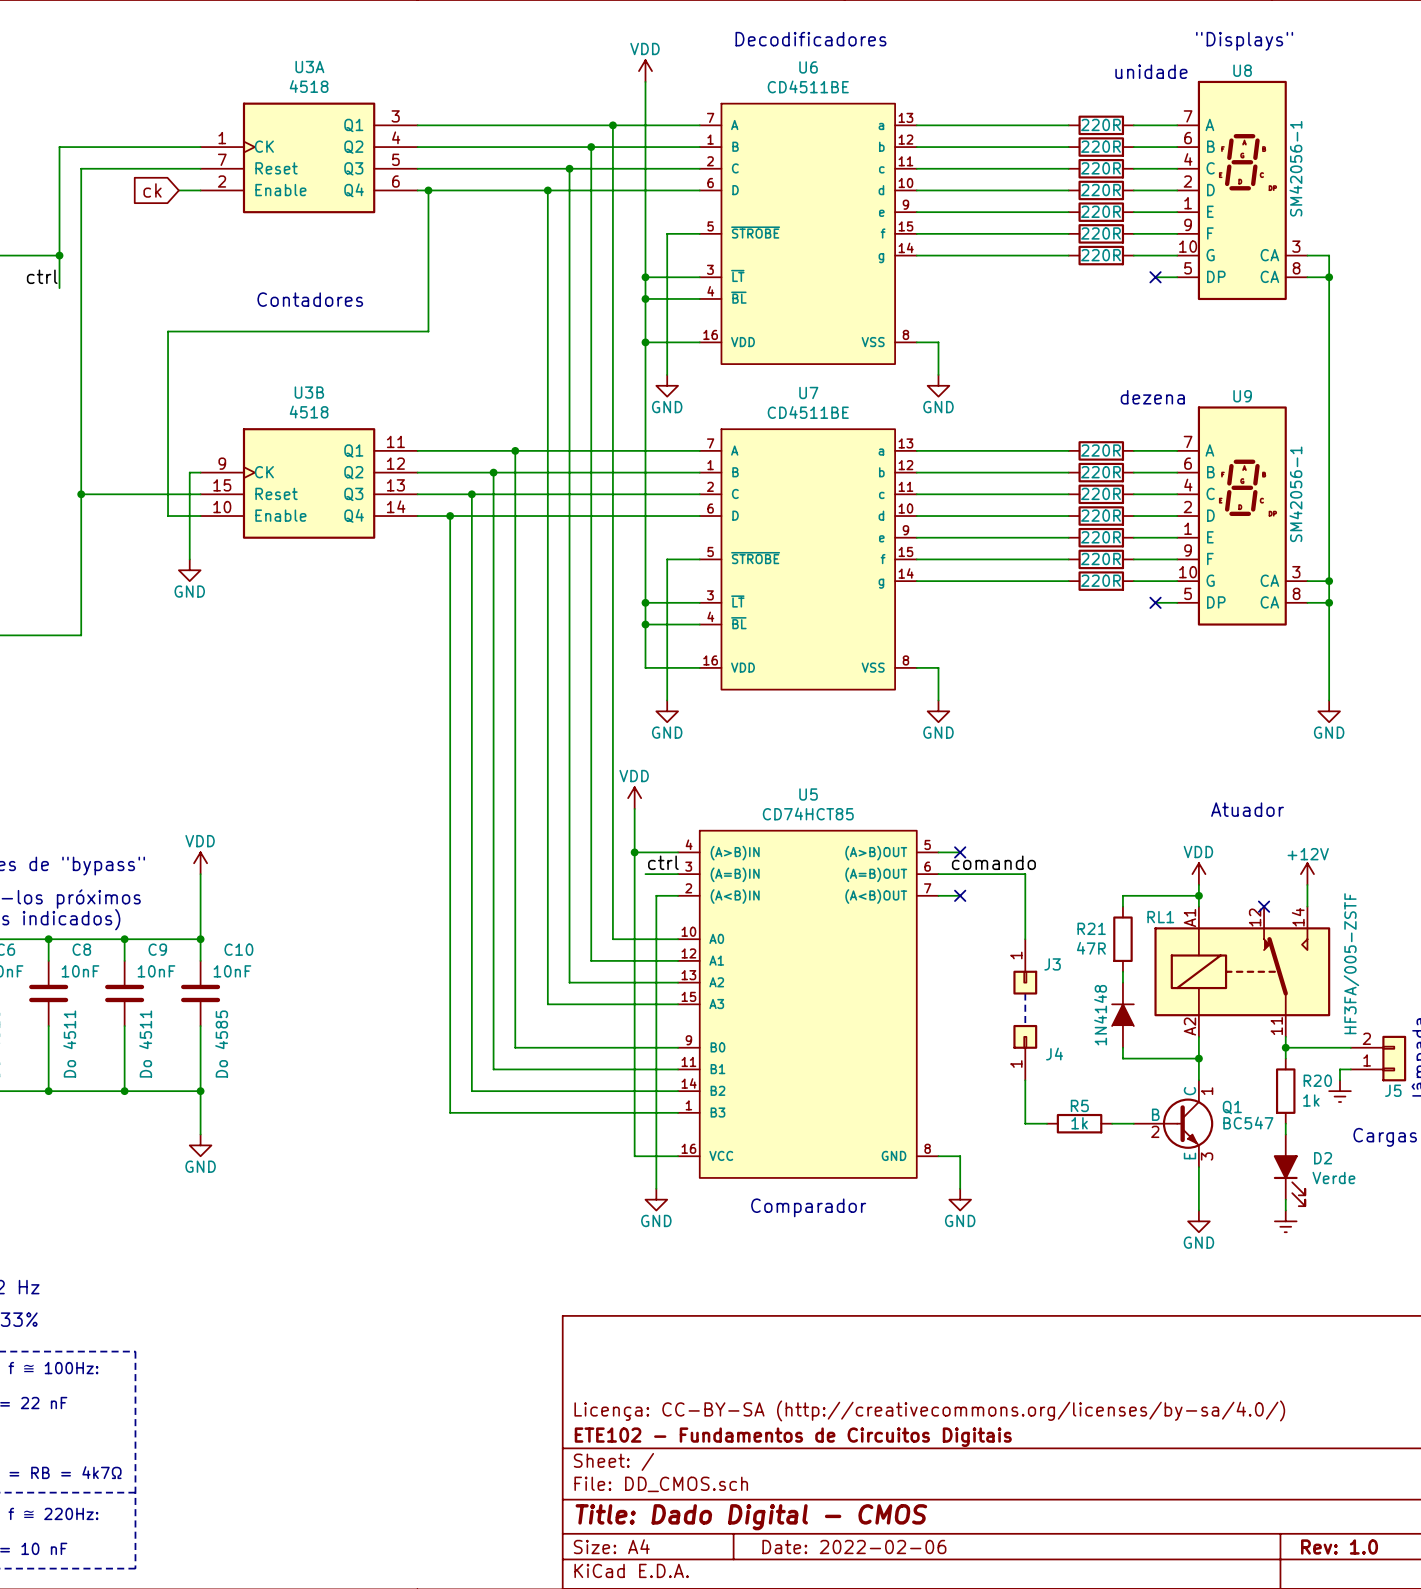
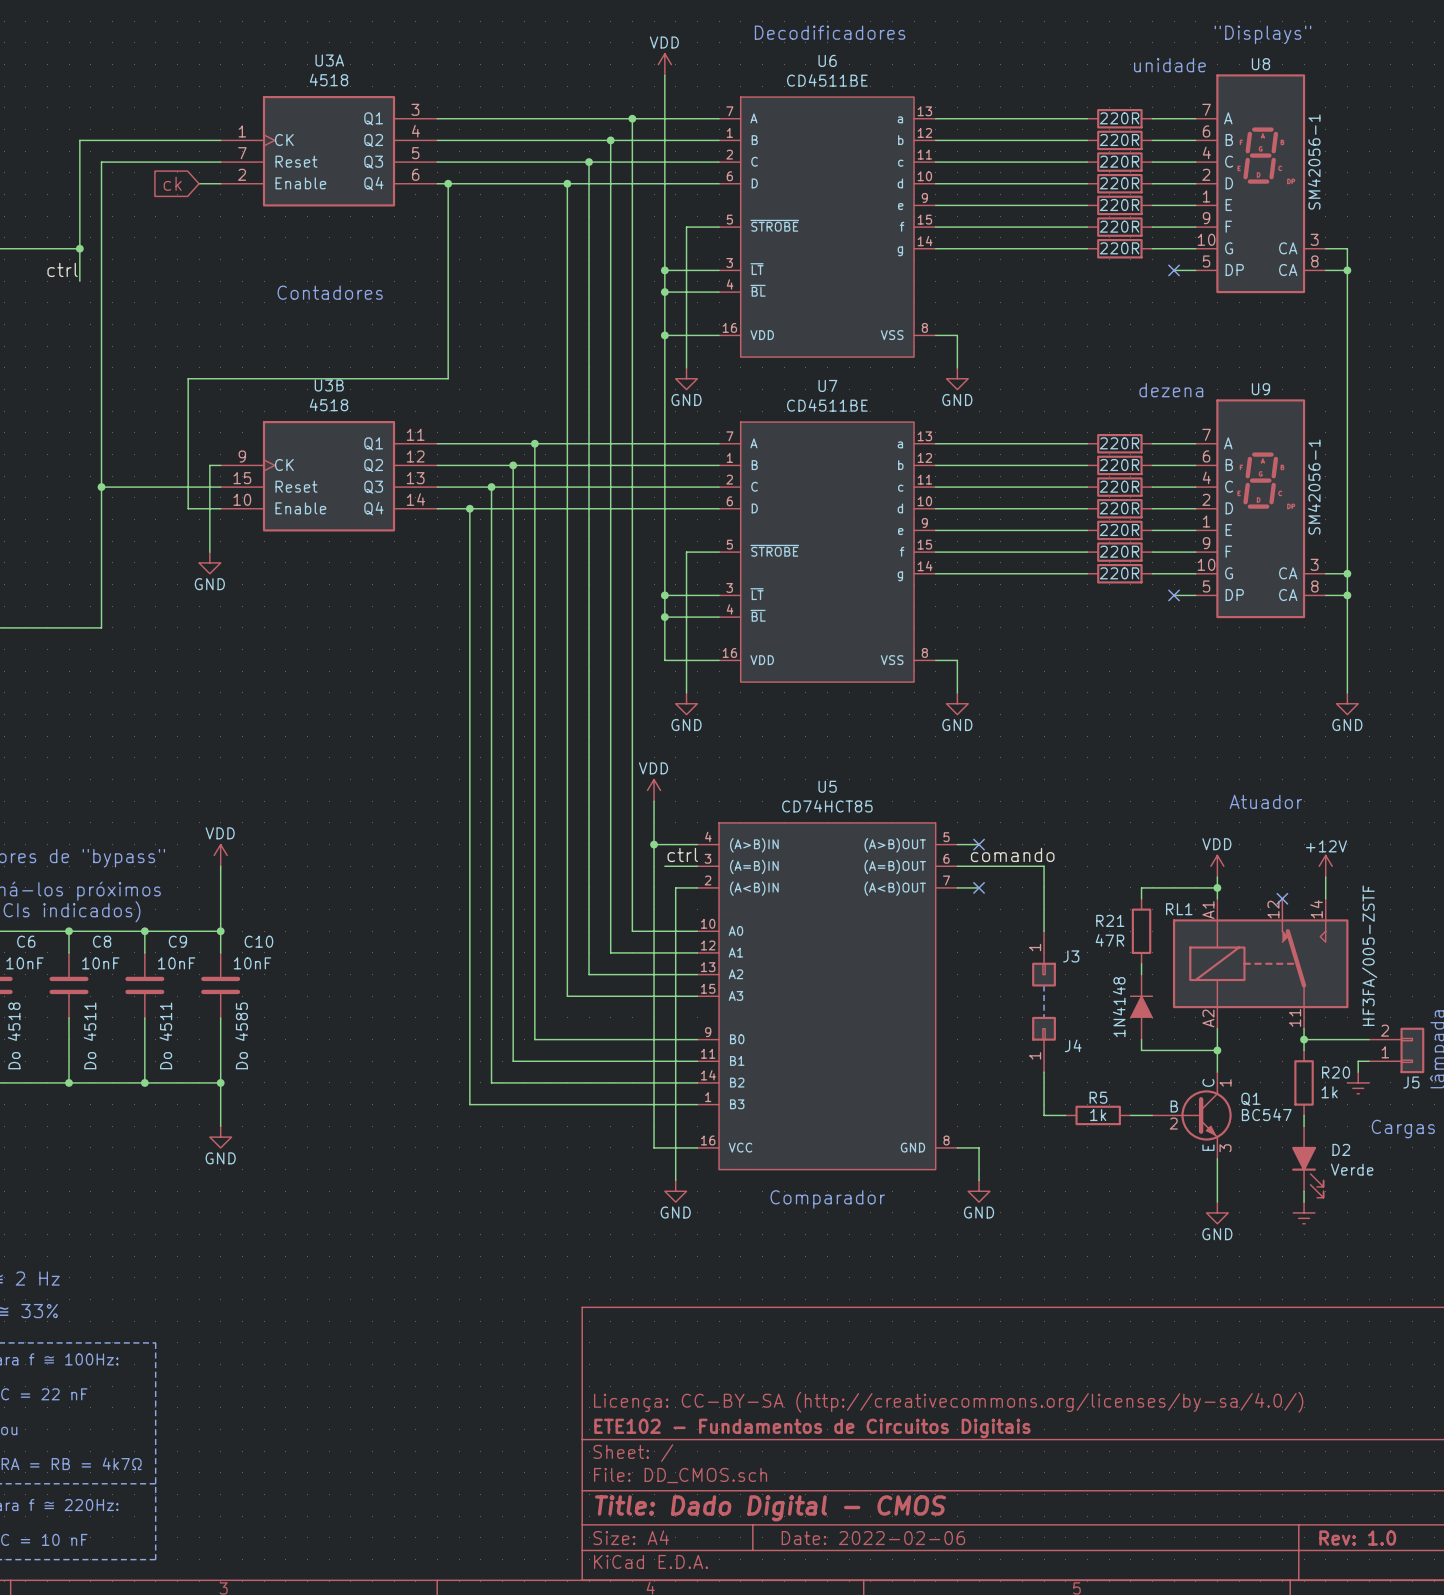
wire: (428, 331) (168, 331) (168, 385) -> (448, 324) (448, 378) (188, 378)

